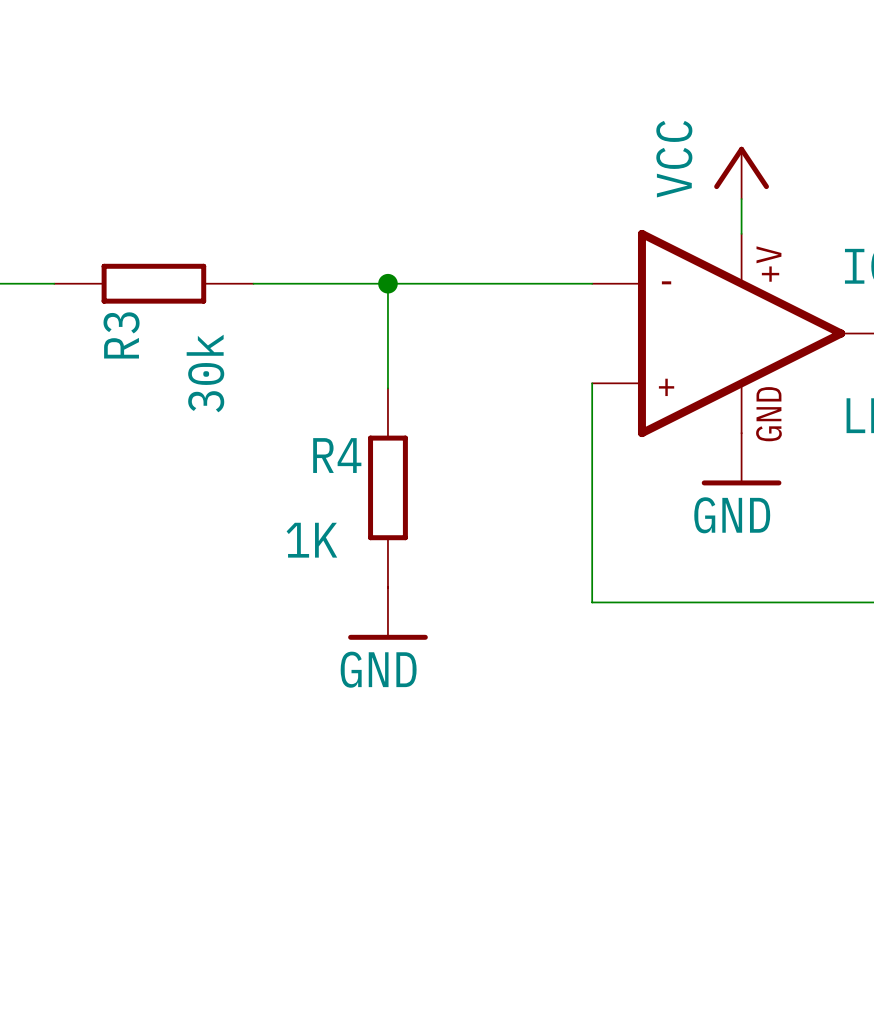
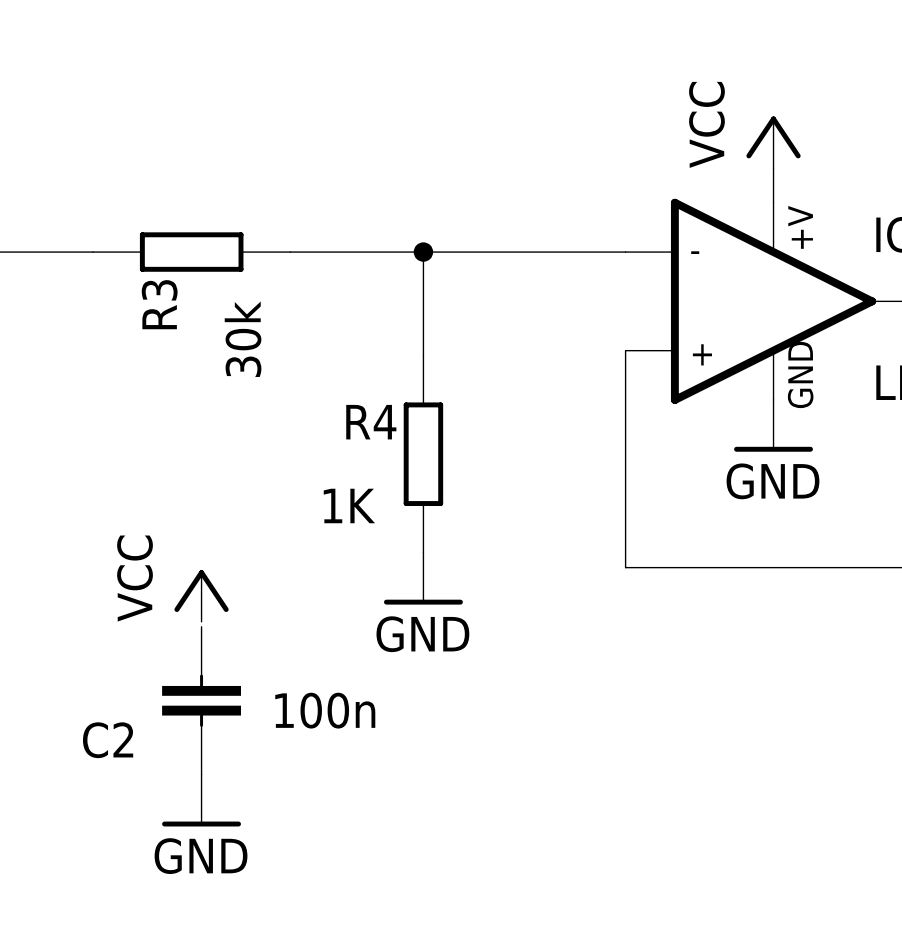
power symbol: none -> VCC (201, 595)
C2: none -> 100n (201, 700)
power symbol: none -> GND (201, 800)

